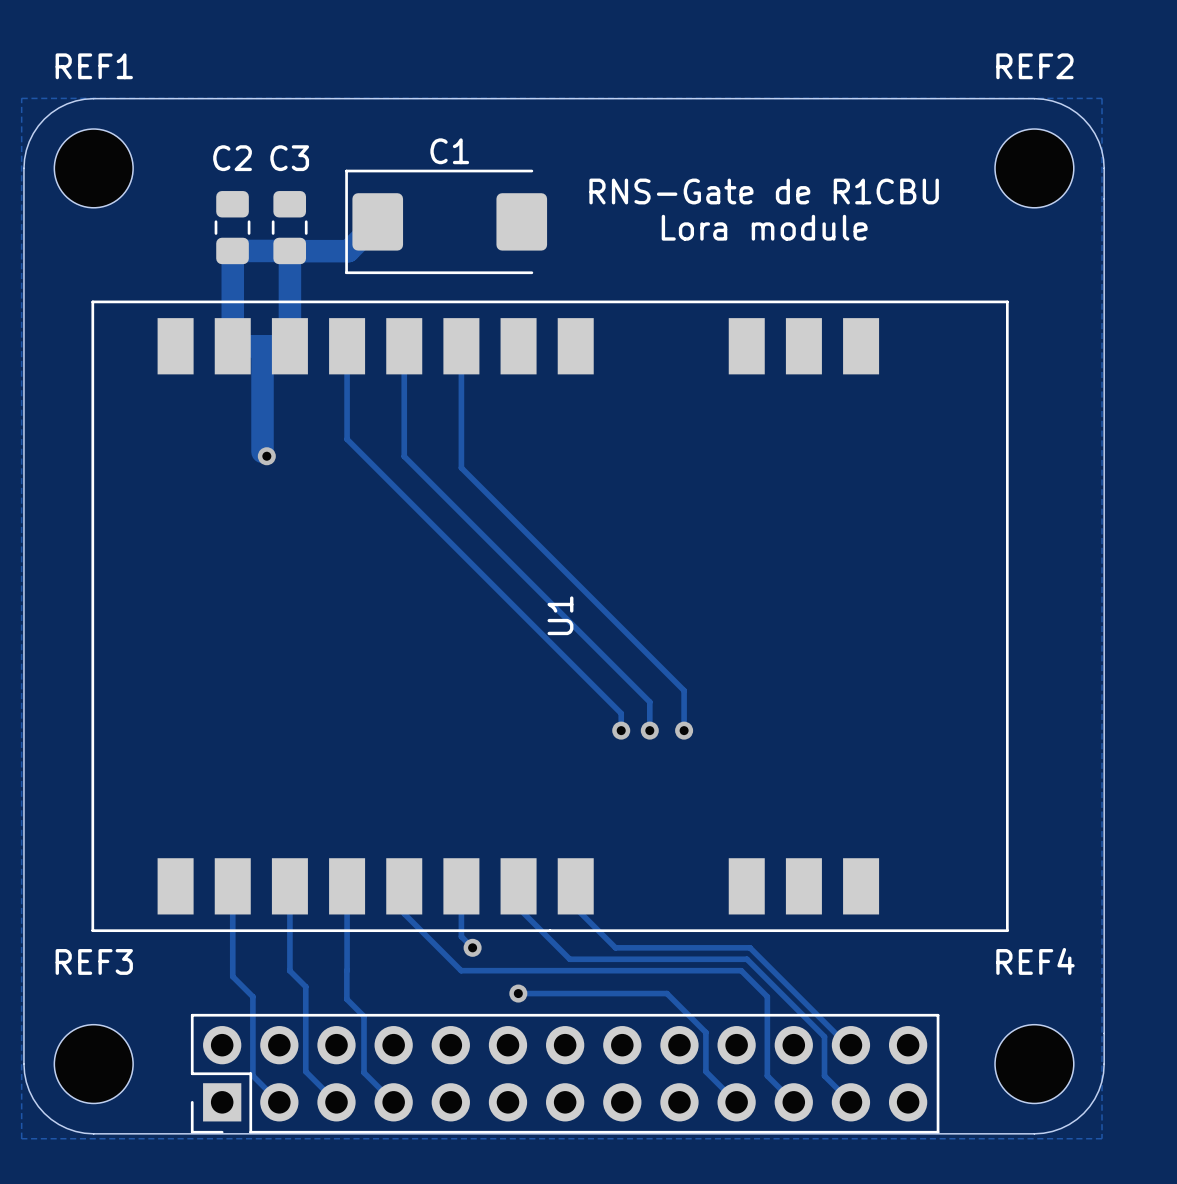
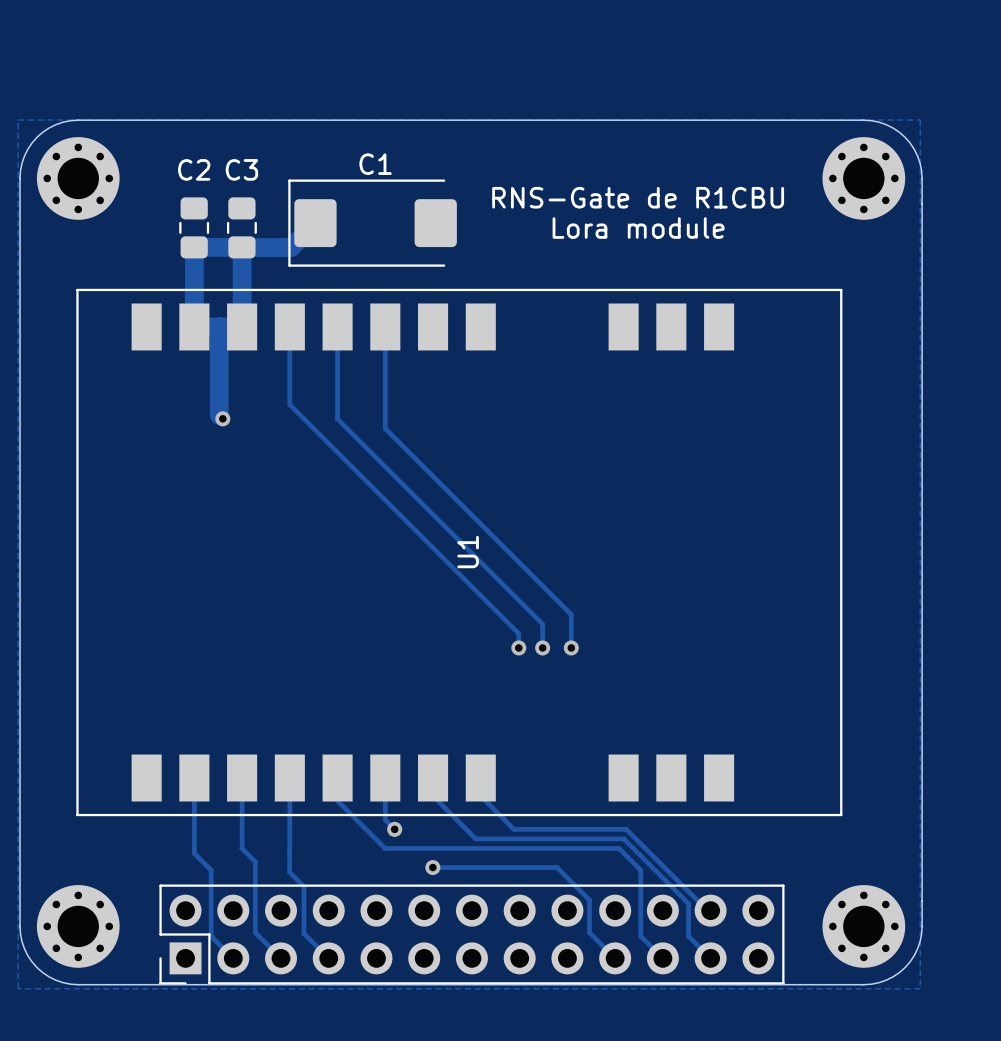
REF1: (93, 168) -> none
part: none -> (78, 178)
REF2: (1034, 168) -> none
part: none -> (863, 178)
REF3: (93, 1064) -> none
part: none -> (78, 926)
REF4: (1034, 1064) -> none
part: none -> (863, 926)

